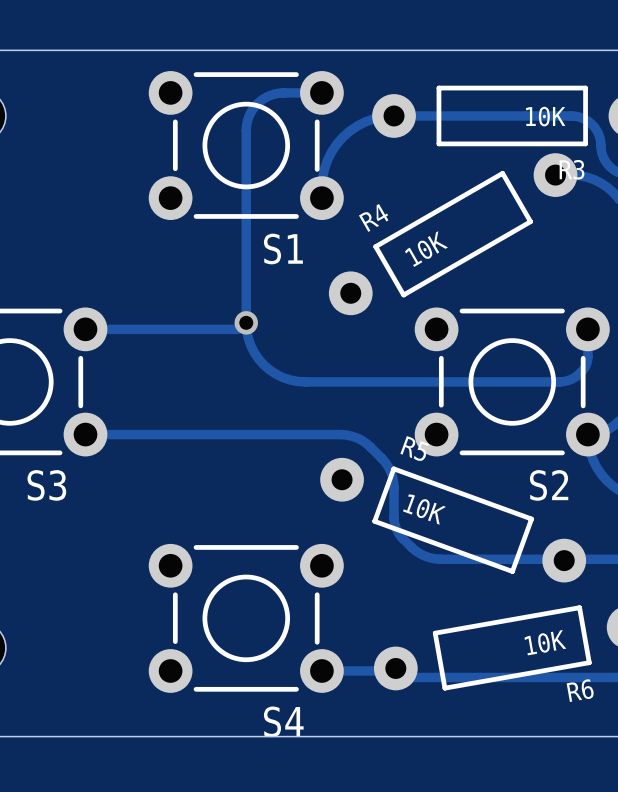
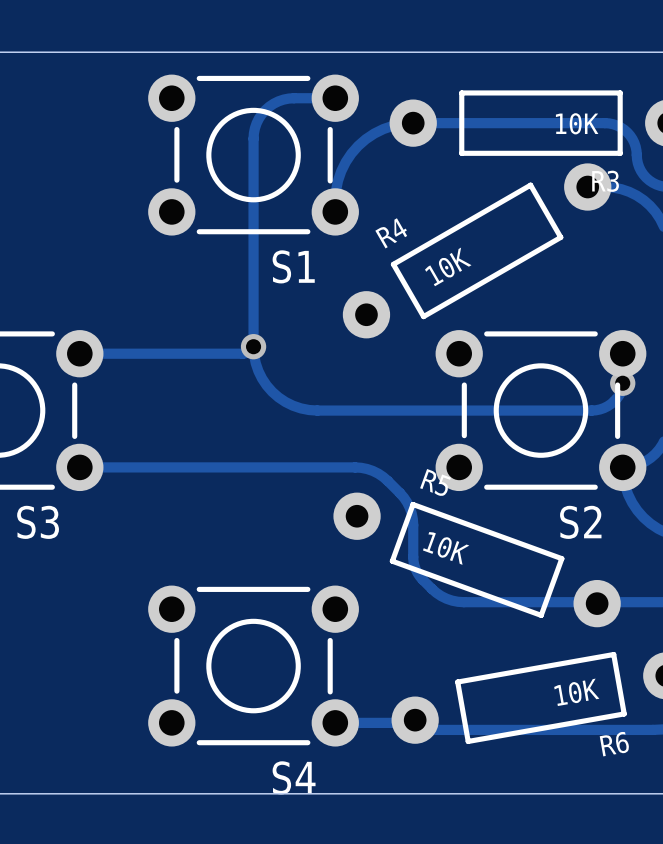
via: none -> (622, 383)

